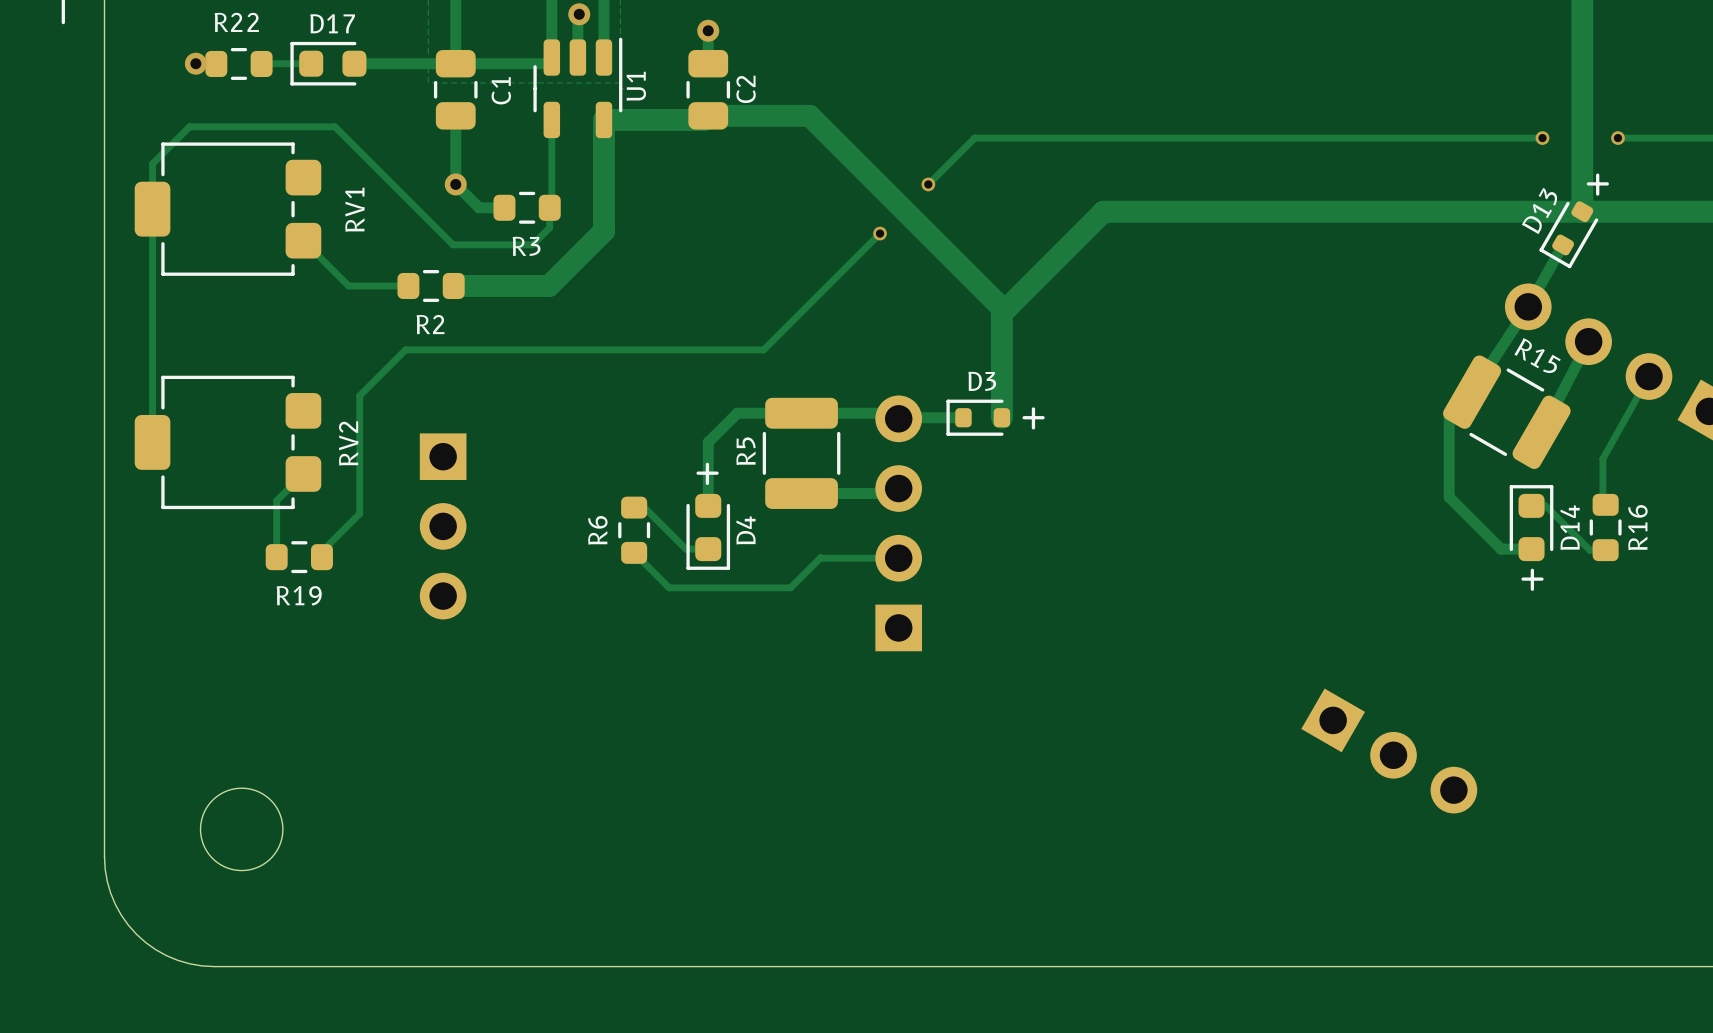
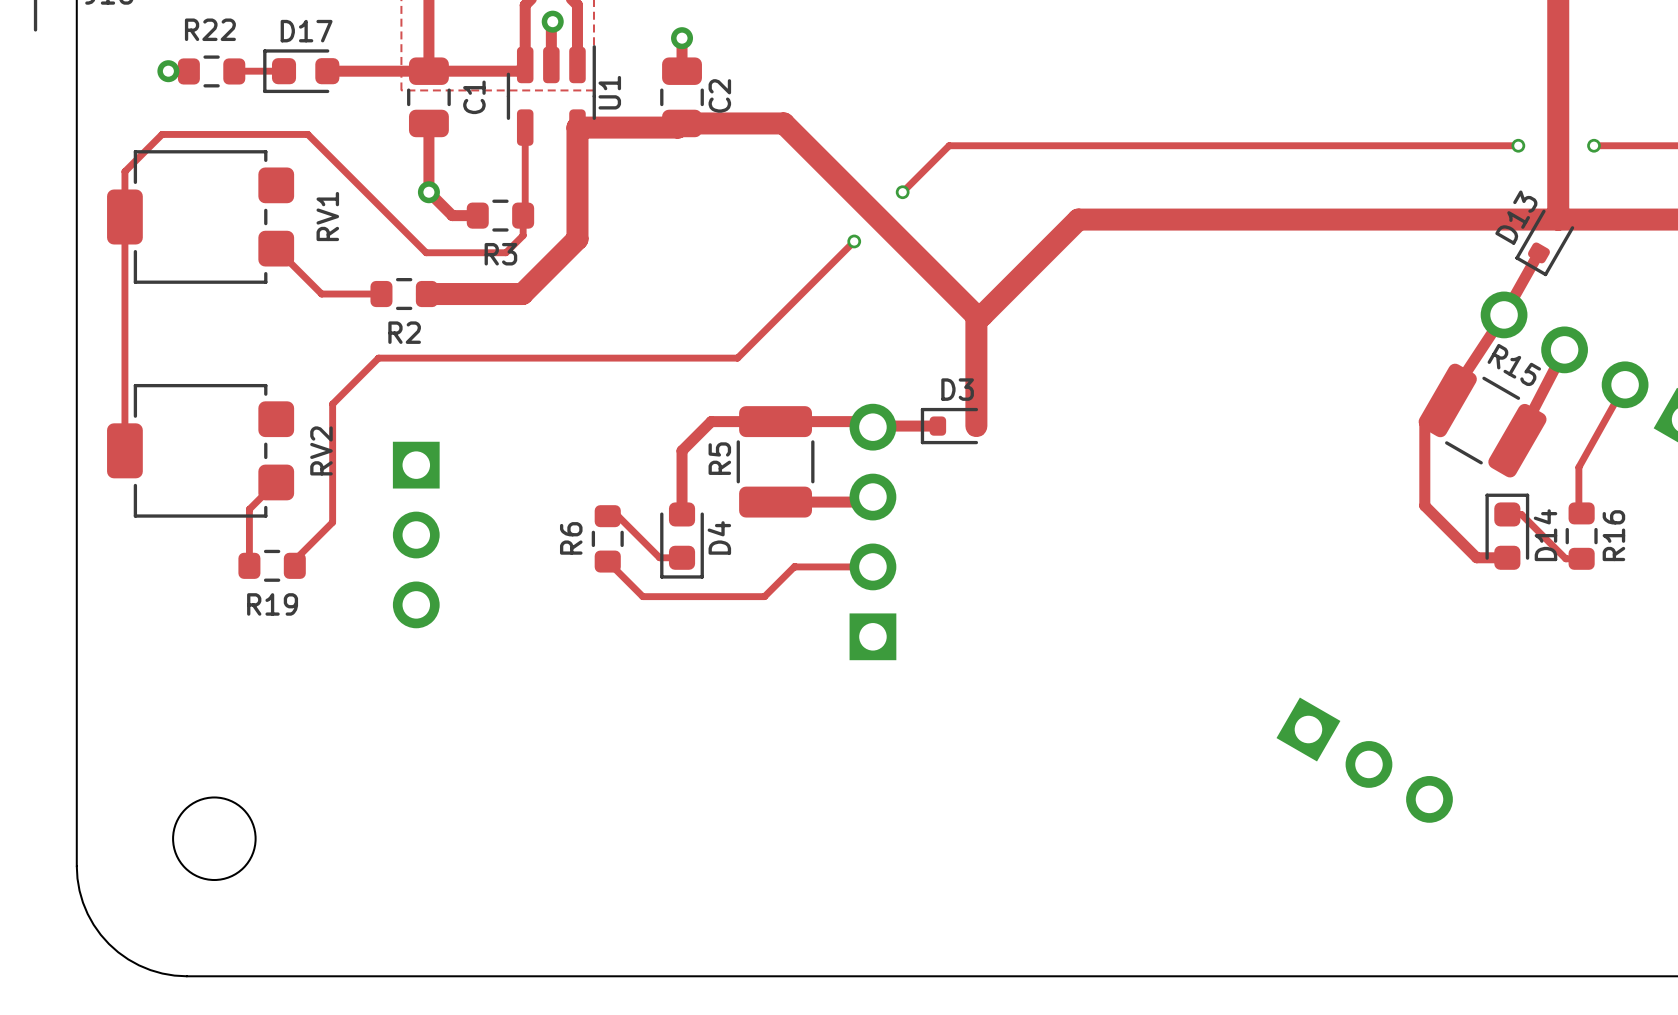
line: (1597, 175) (1597, 194) -> none
line: (1588, 183) (1607, 183) -> none
line: (1033, 408) (1033, 427) -> none
line: (1024, 417) (1043, 417) -> none
line: (707, 464) (707, 483) -> none
line: (698, 473) (717, 473) -> none
line: (1532, 570) (1532, 589) -> none
line: (1523, 579) (1541, 579) -> none

